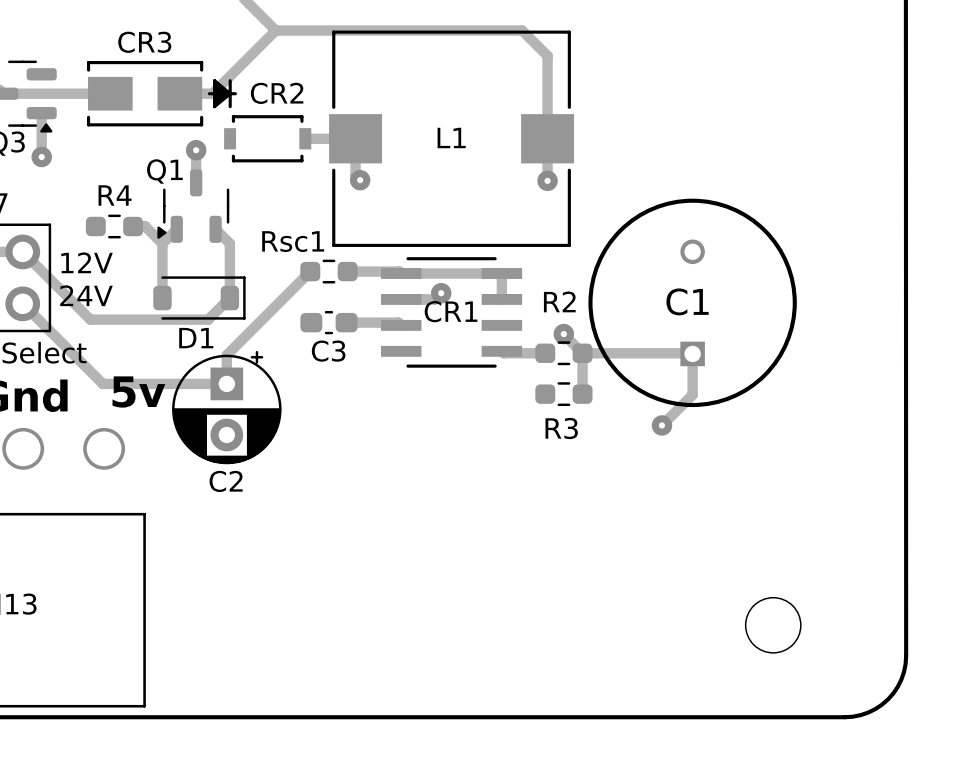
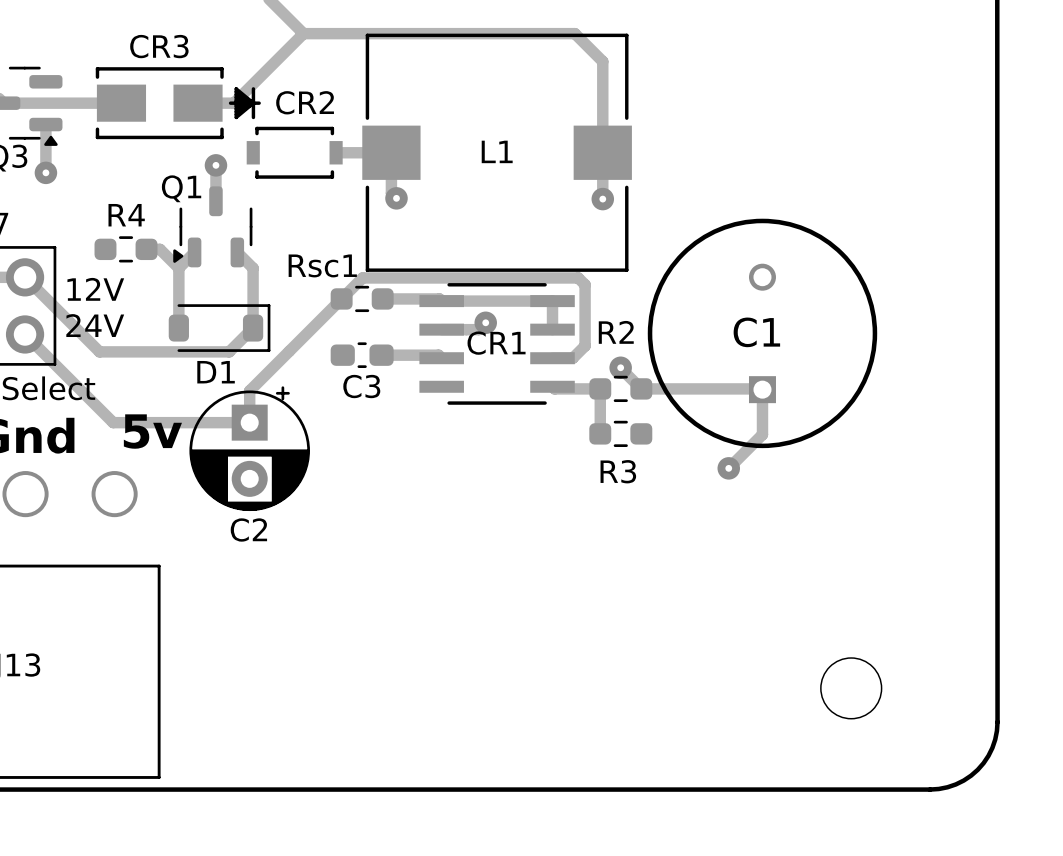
track: none -> (341, 298) (362, 277) (578, 277) (585, 284) (585, 345) (572, 358) (552, 358)
track: (582, 353) (582, 394) -> (600, 388) (600, 433)

